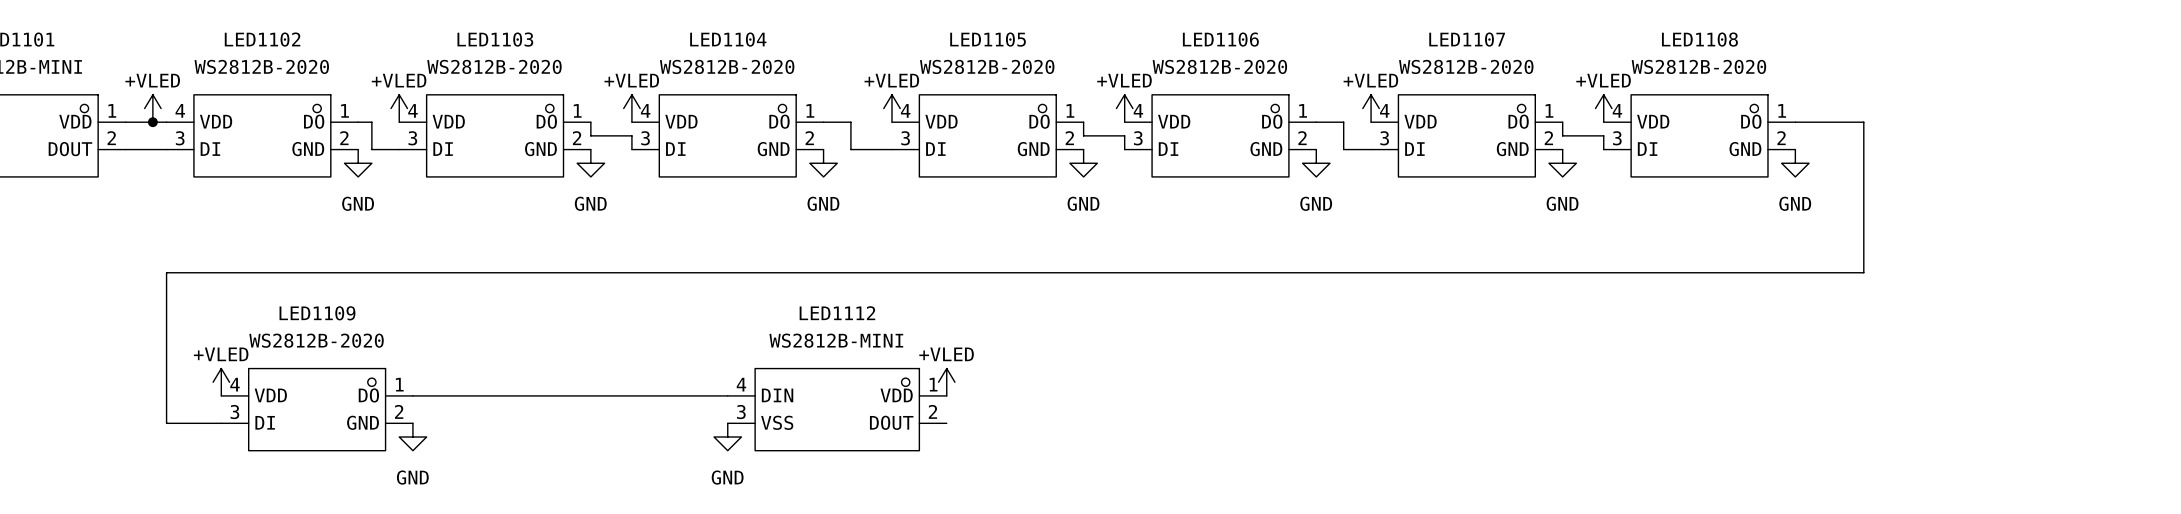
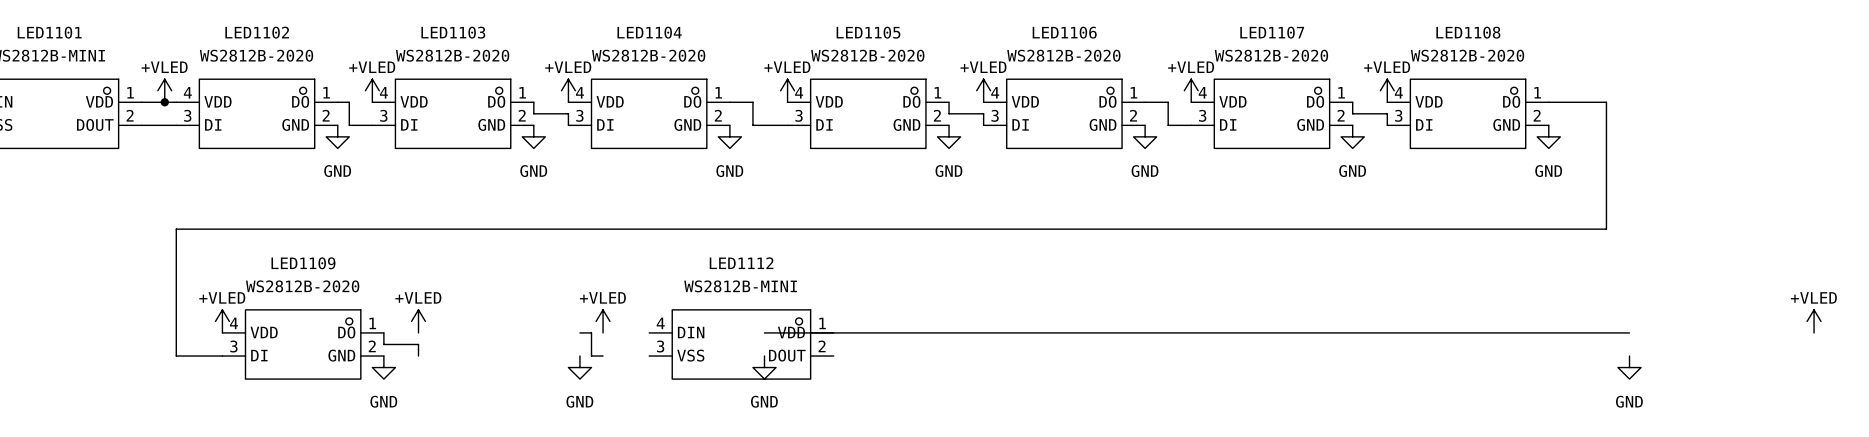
power symbol: none -> +VLED (418, 321)
power symbol: none -> +VLED (603, 321)
power symbol: +VLED (946, 382) -> none
power symbol: none -> +VLED (1814, 321)
wire: (412, 395) (645, 395) -> (383, 332) (383, 344) (418, 344) (418, 356)
wire: (659, 395) (727, 395) -> (591, 332) (591, 356) (603, 356)
wire: none -> (764, 332) (1629, 332)
power symbol: none -> GND (579, 367)
power symbol: GND (727, 437) -> none
power symbol: none -> GND (764, 367)
power symbol: none -> GND (1629, 367)

